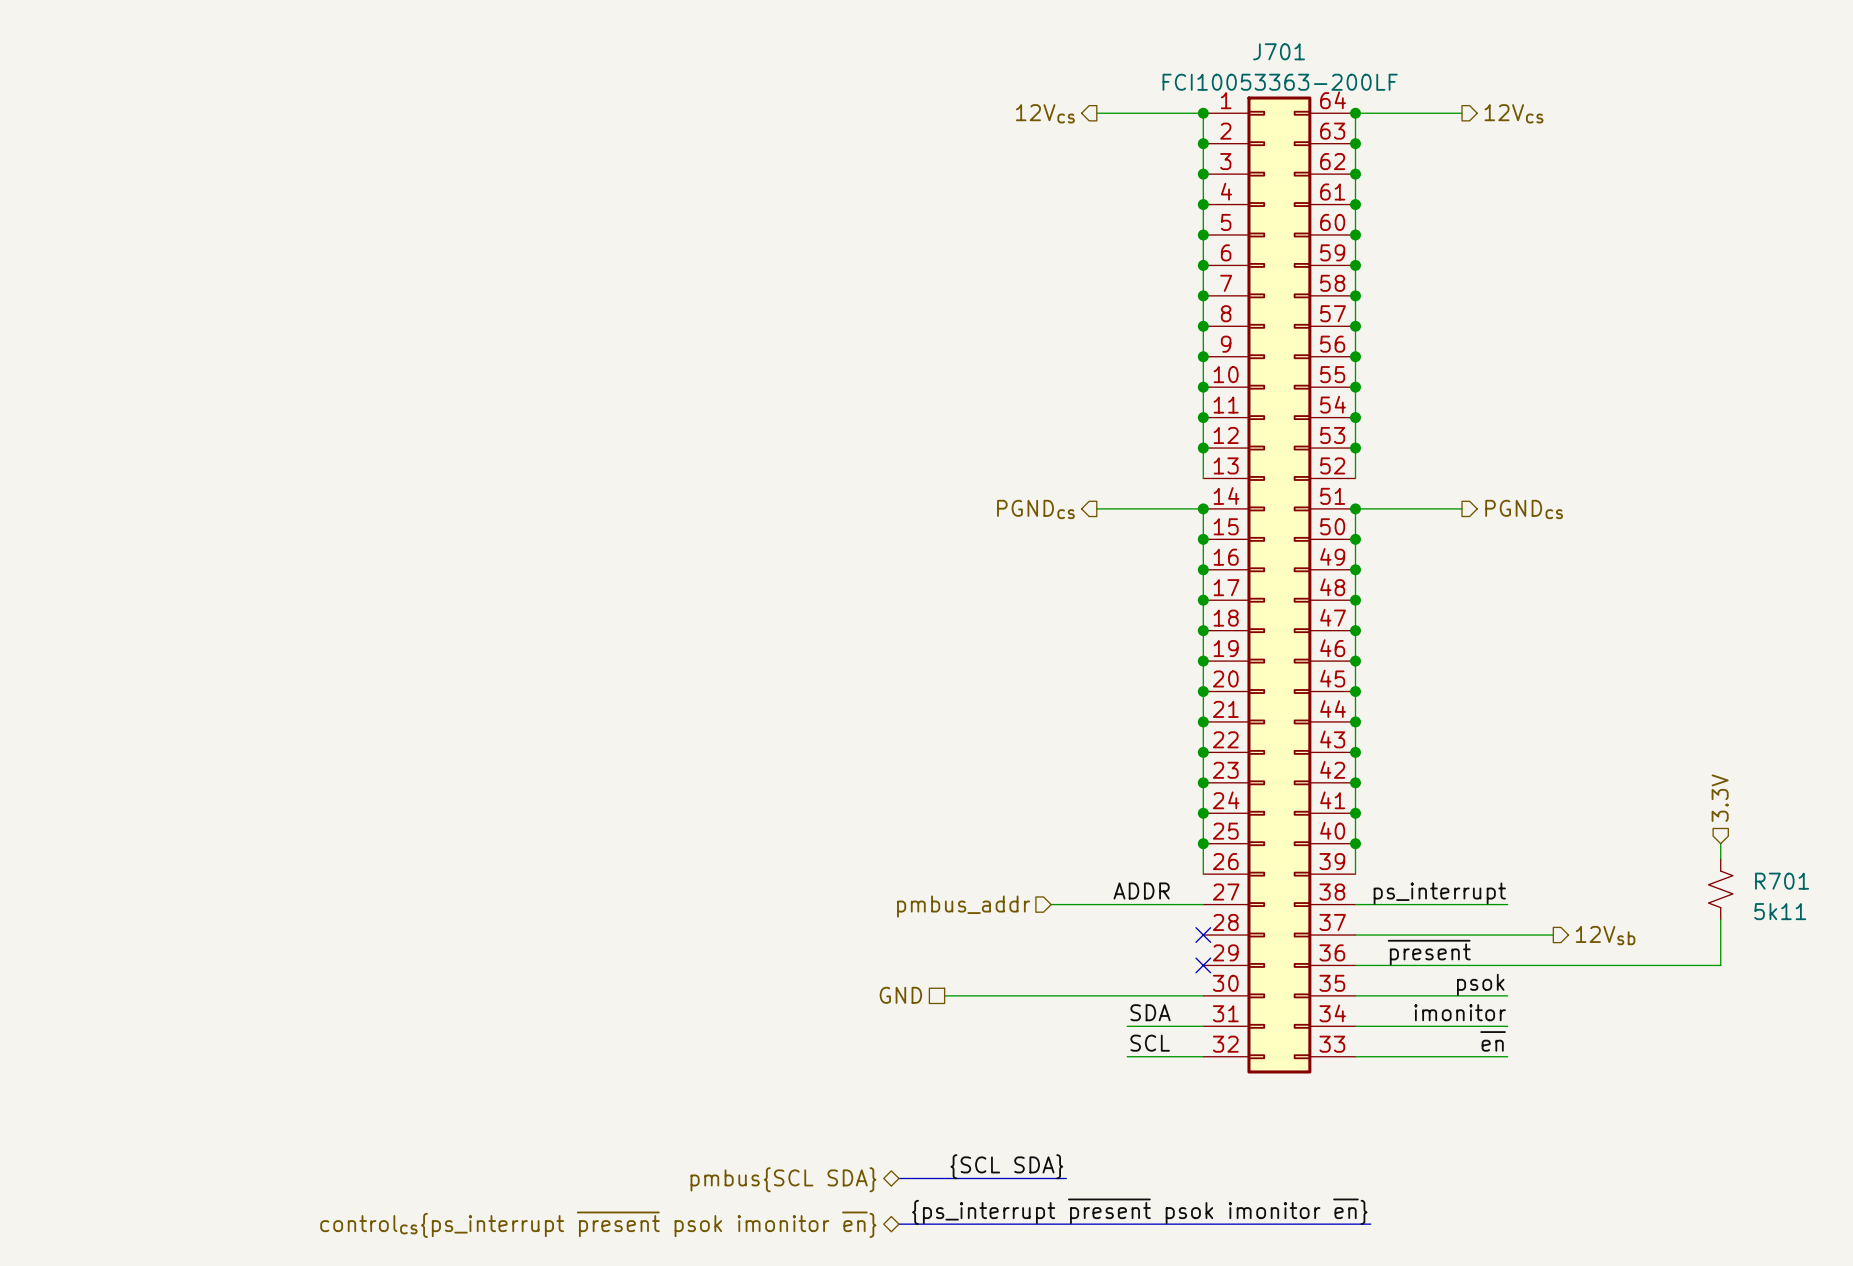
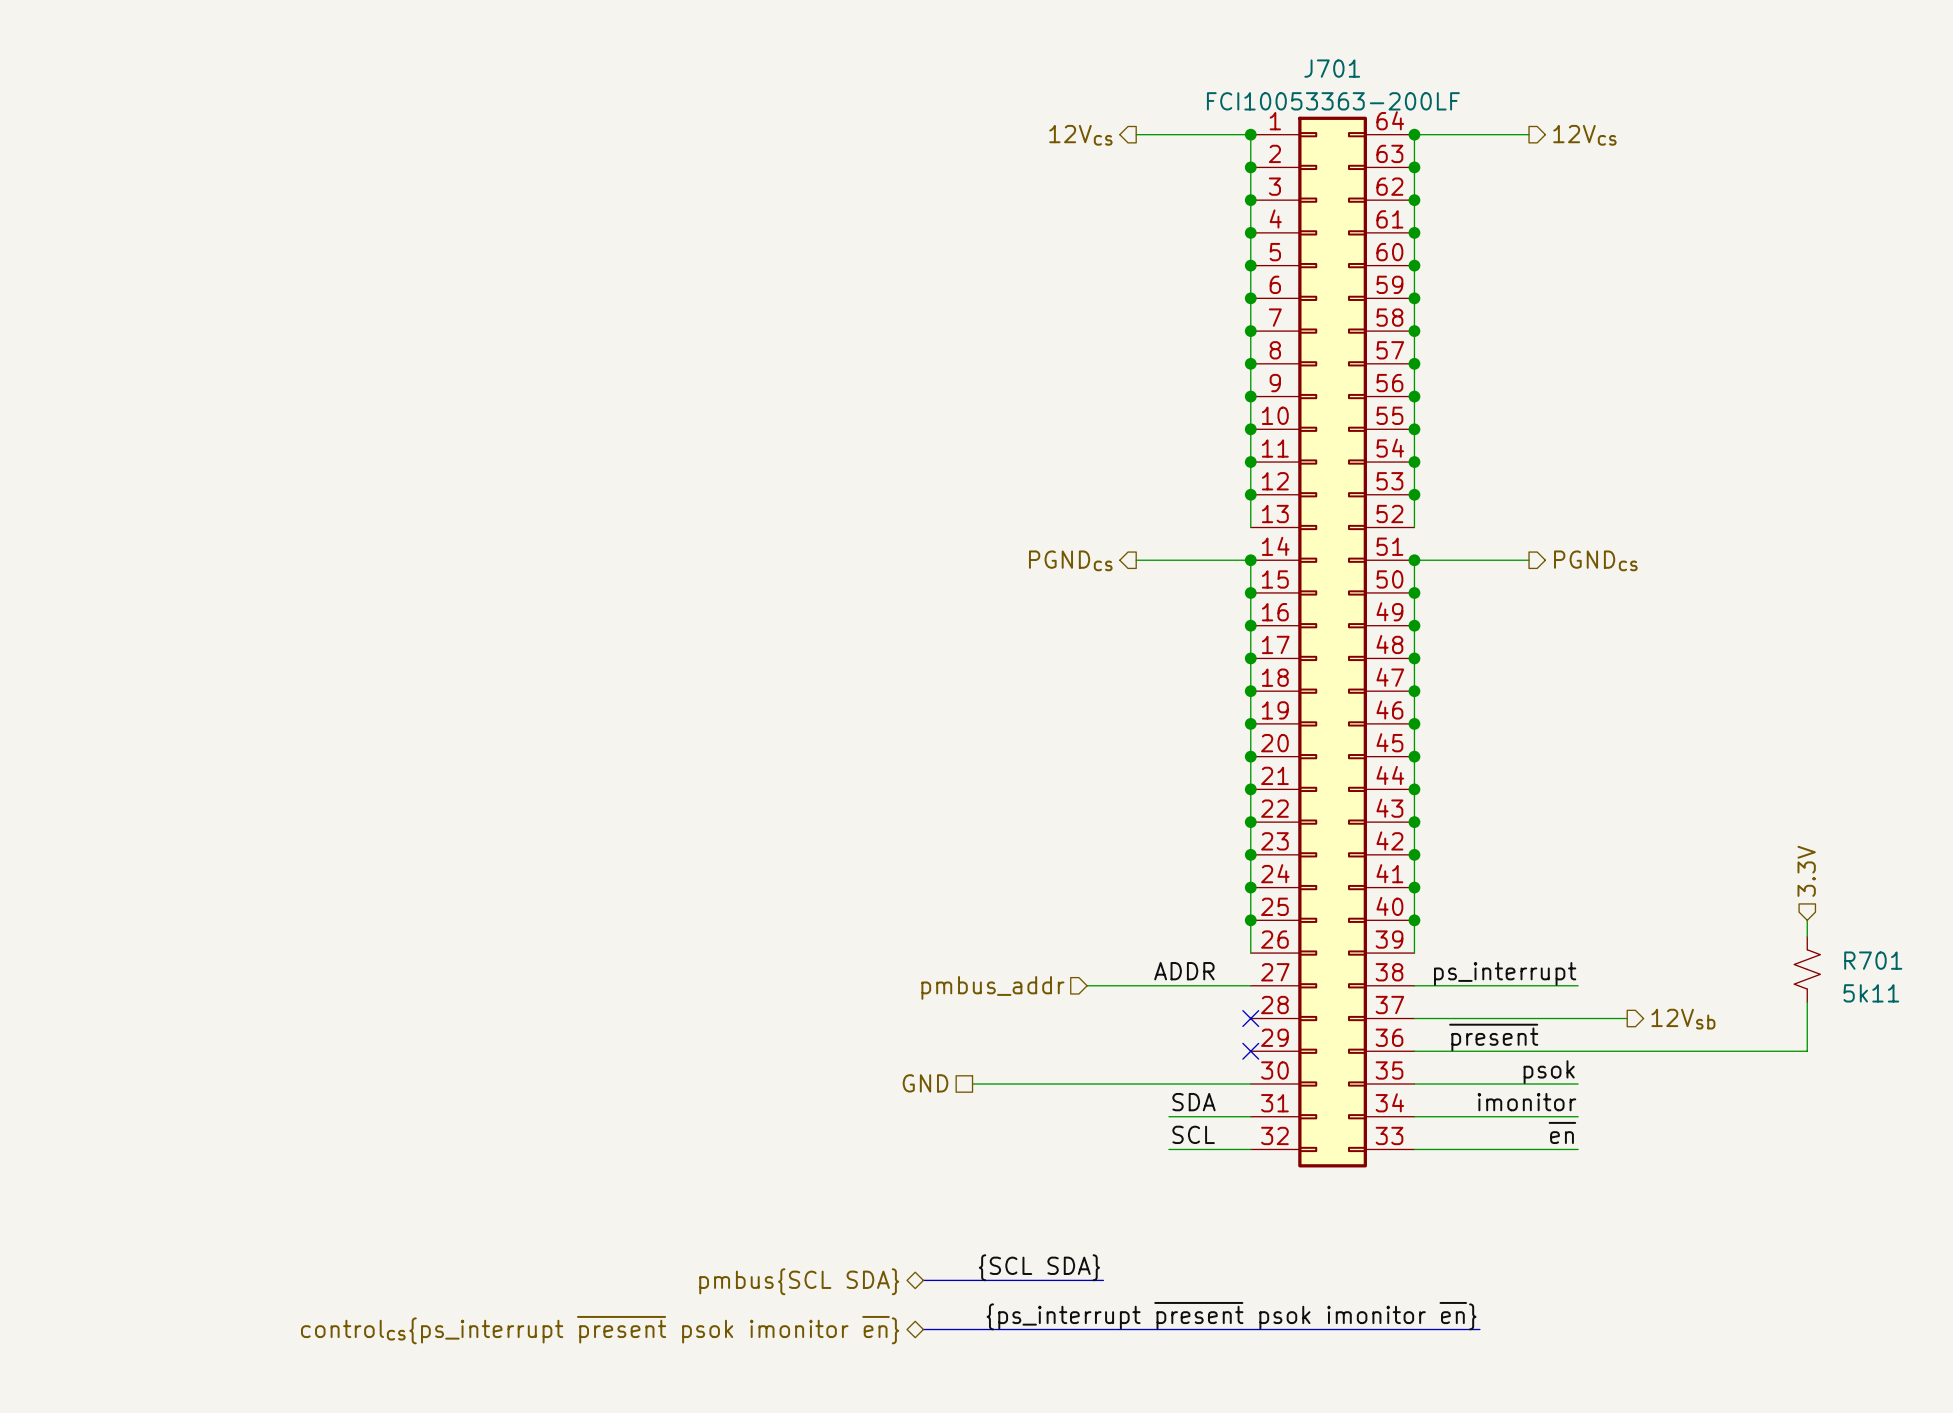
label position: {ps_interrupt ~{present} psok imonitor ~{en}} (1139, 1211) -> {ps_interrupt ~{present} psok imonitor ~{en}} (1231, 1316)
bus: none -> (1430, 1329) (1479, 1329)

